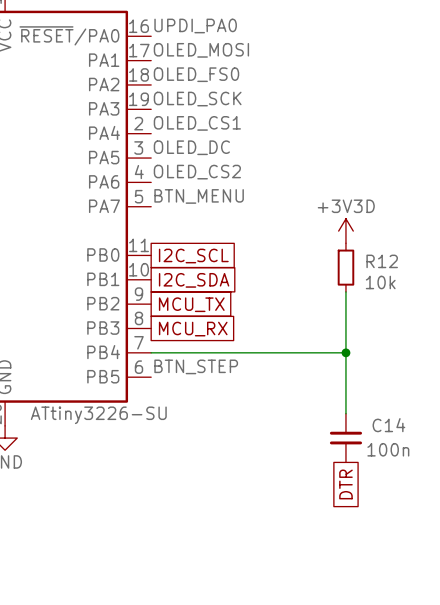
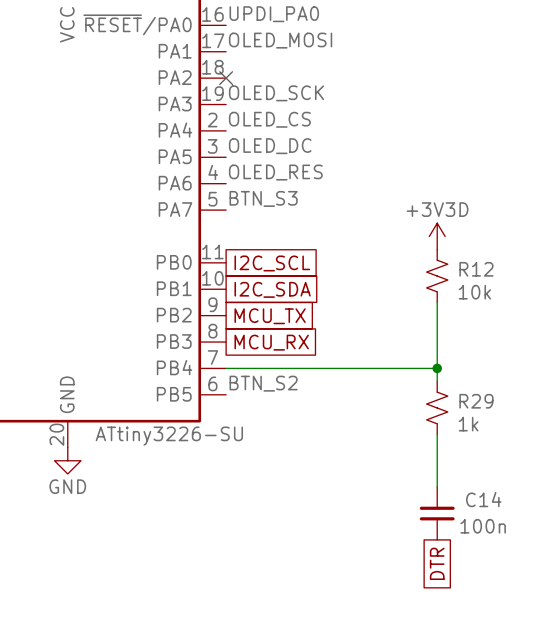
label: OLED_FS0 (196, 74) -> none
no-connect mark: none -> (226, 78)
label: OLED_CS1 (197, 123) -> OLED_CS (269, 119)
label: OLED_CS2 (197, 172) -> OLED_RES (275, 172)
label: BTN_MENU (199, 196) -> BTN_S3 (263, 198)
R12 symbol: [337, 243, 355, 292] -> [426, 249, 448, 303]
label: BTN_STEP (196, 366) -> BTN_S2 (263, 383)
R29: none -> 1k (437, 407)
C14 position: (345, 438) -> (437, 513)
global label position: DTR (345, 484) -> DTR (437, 563)

